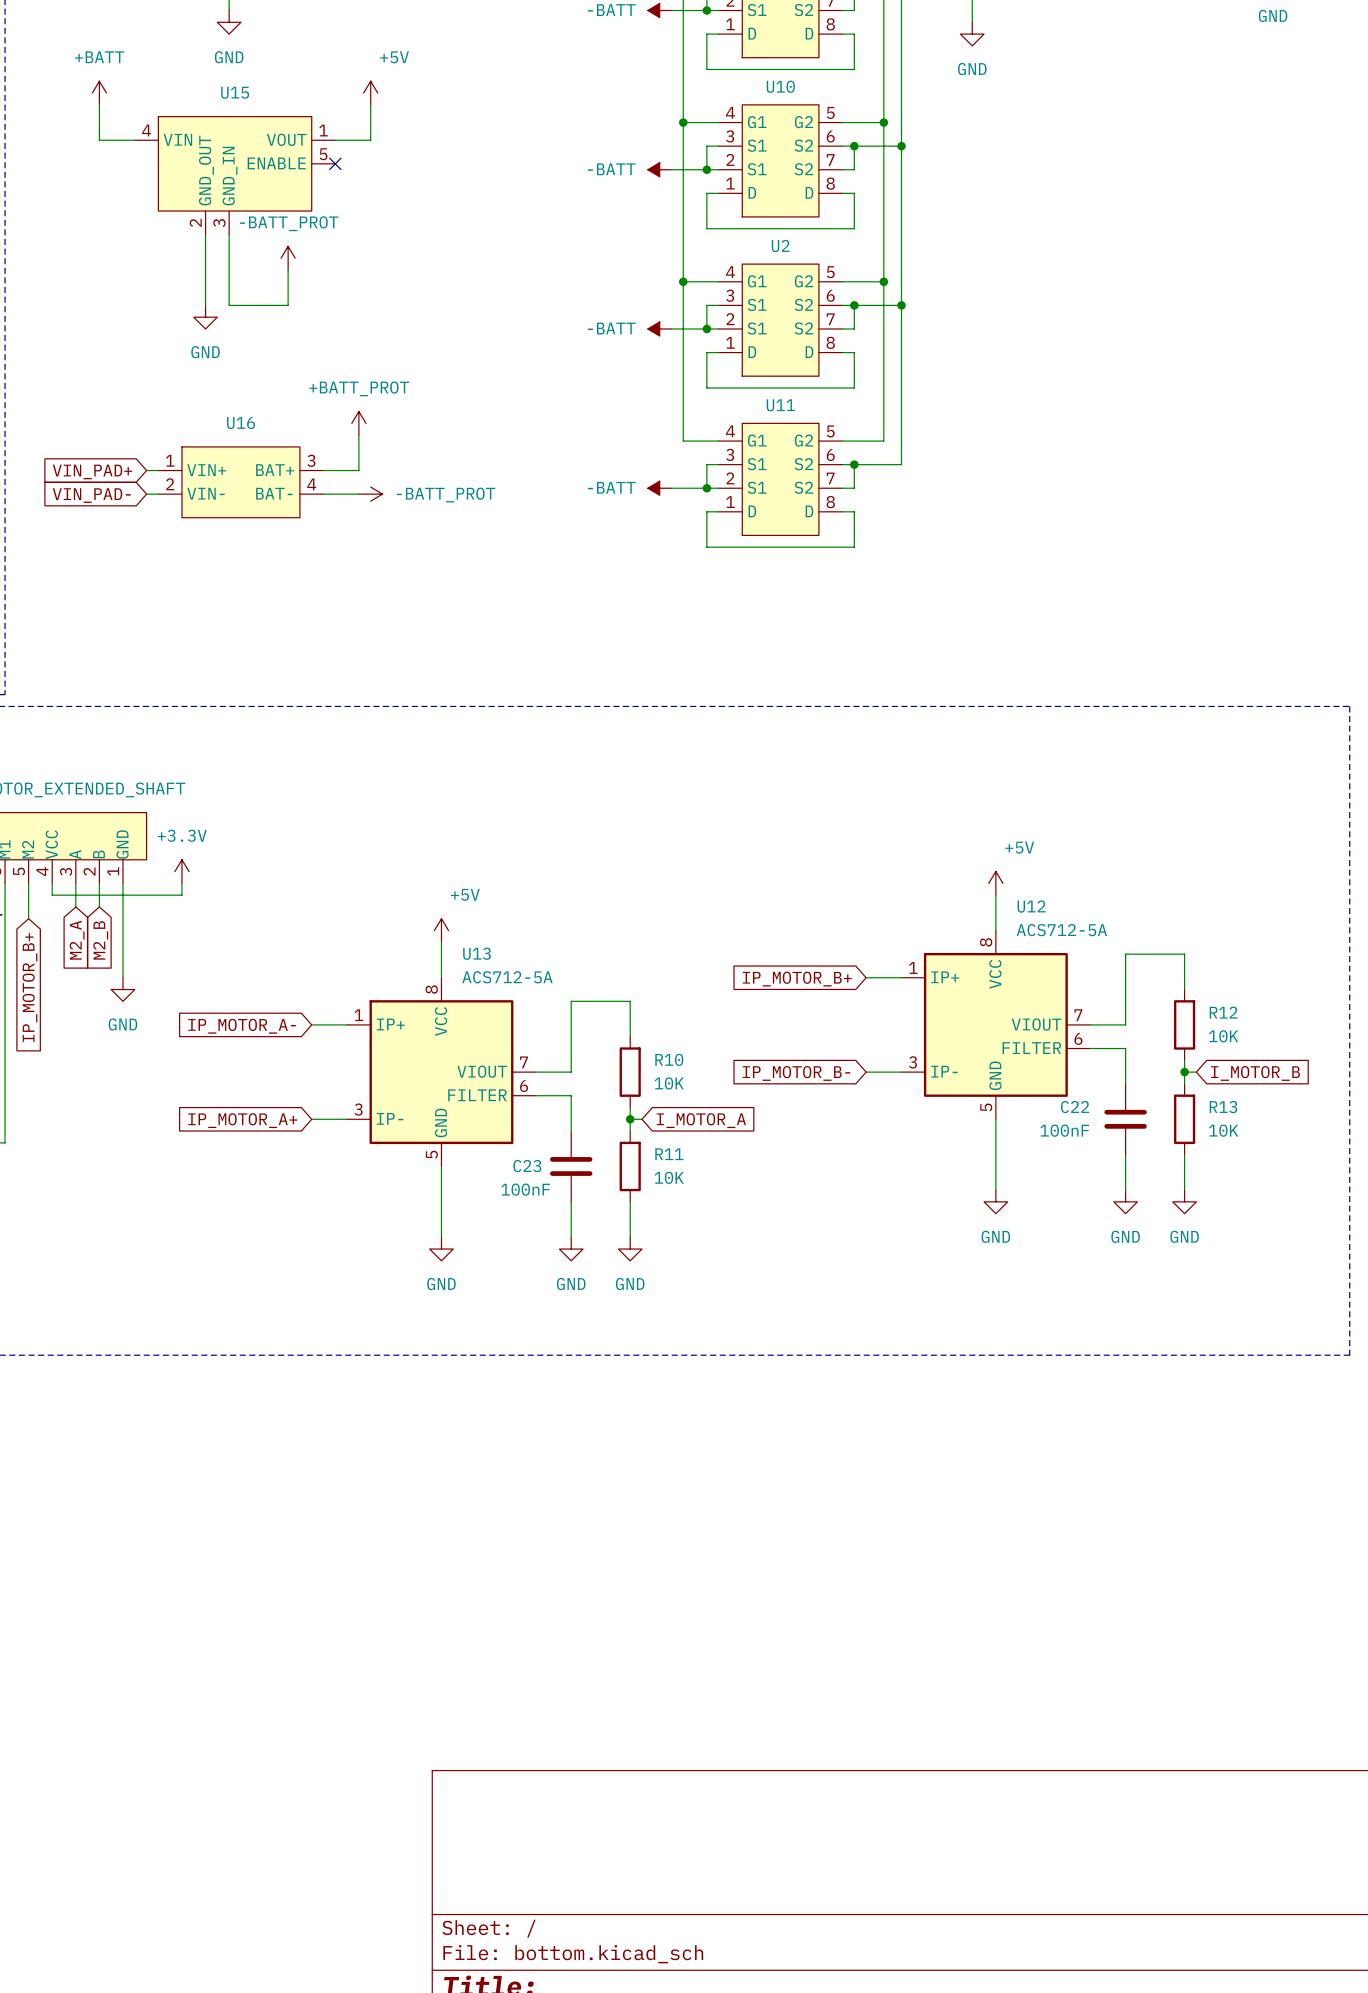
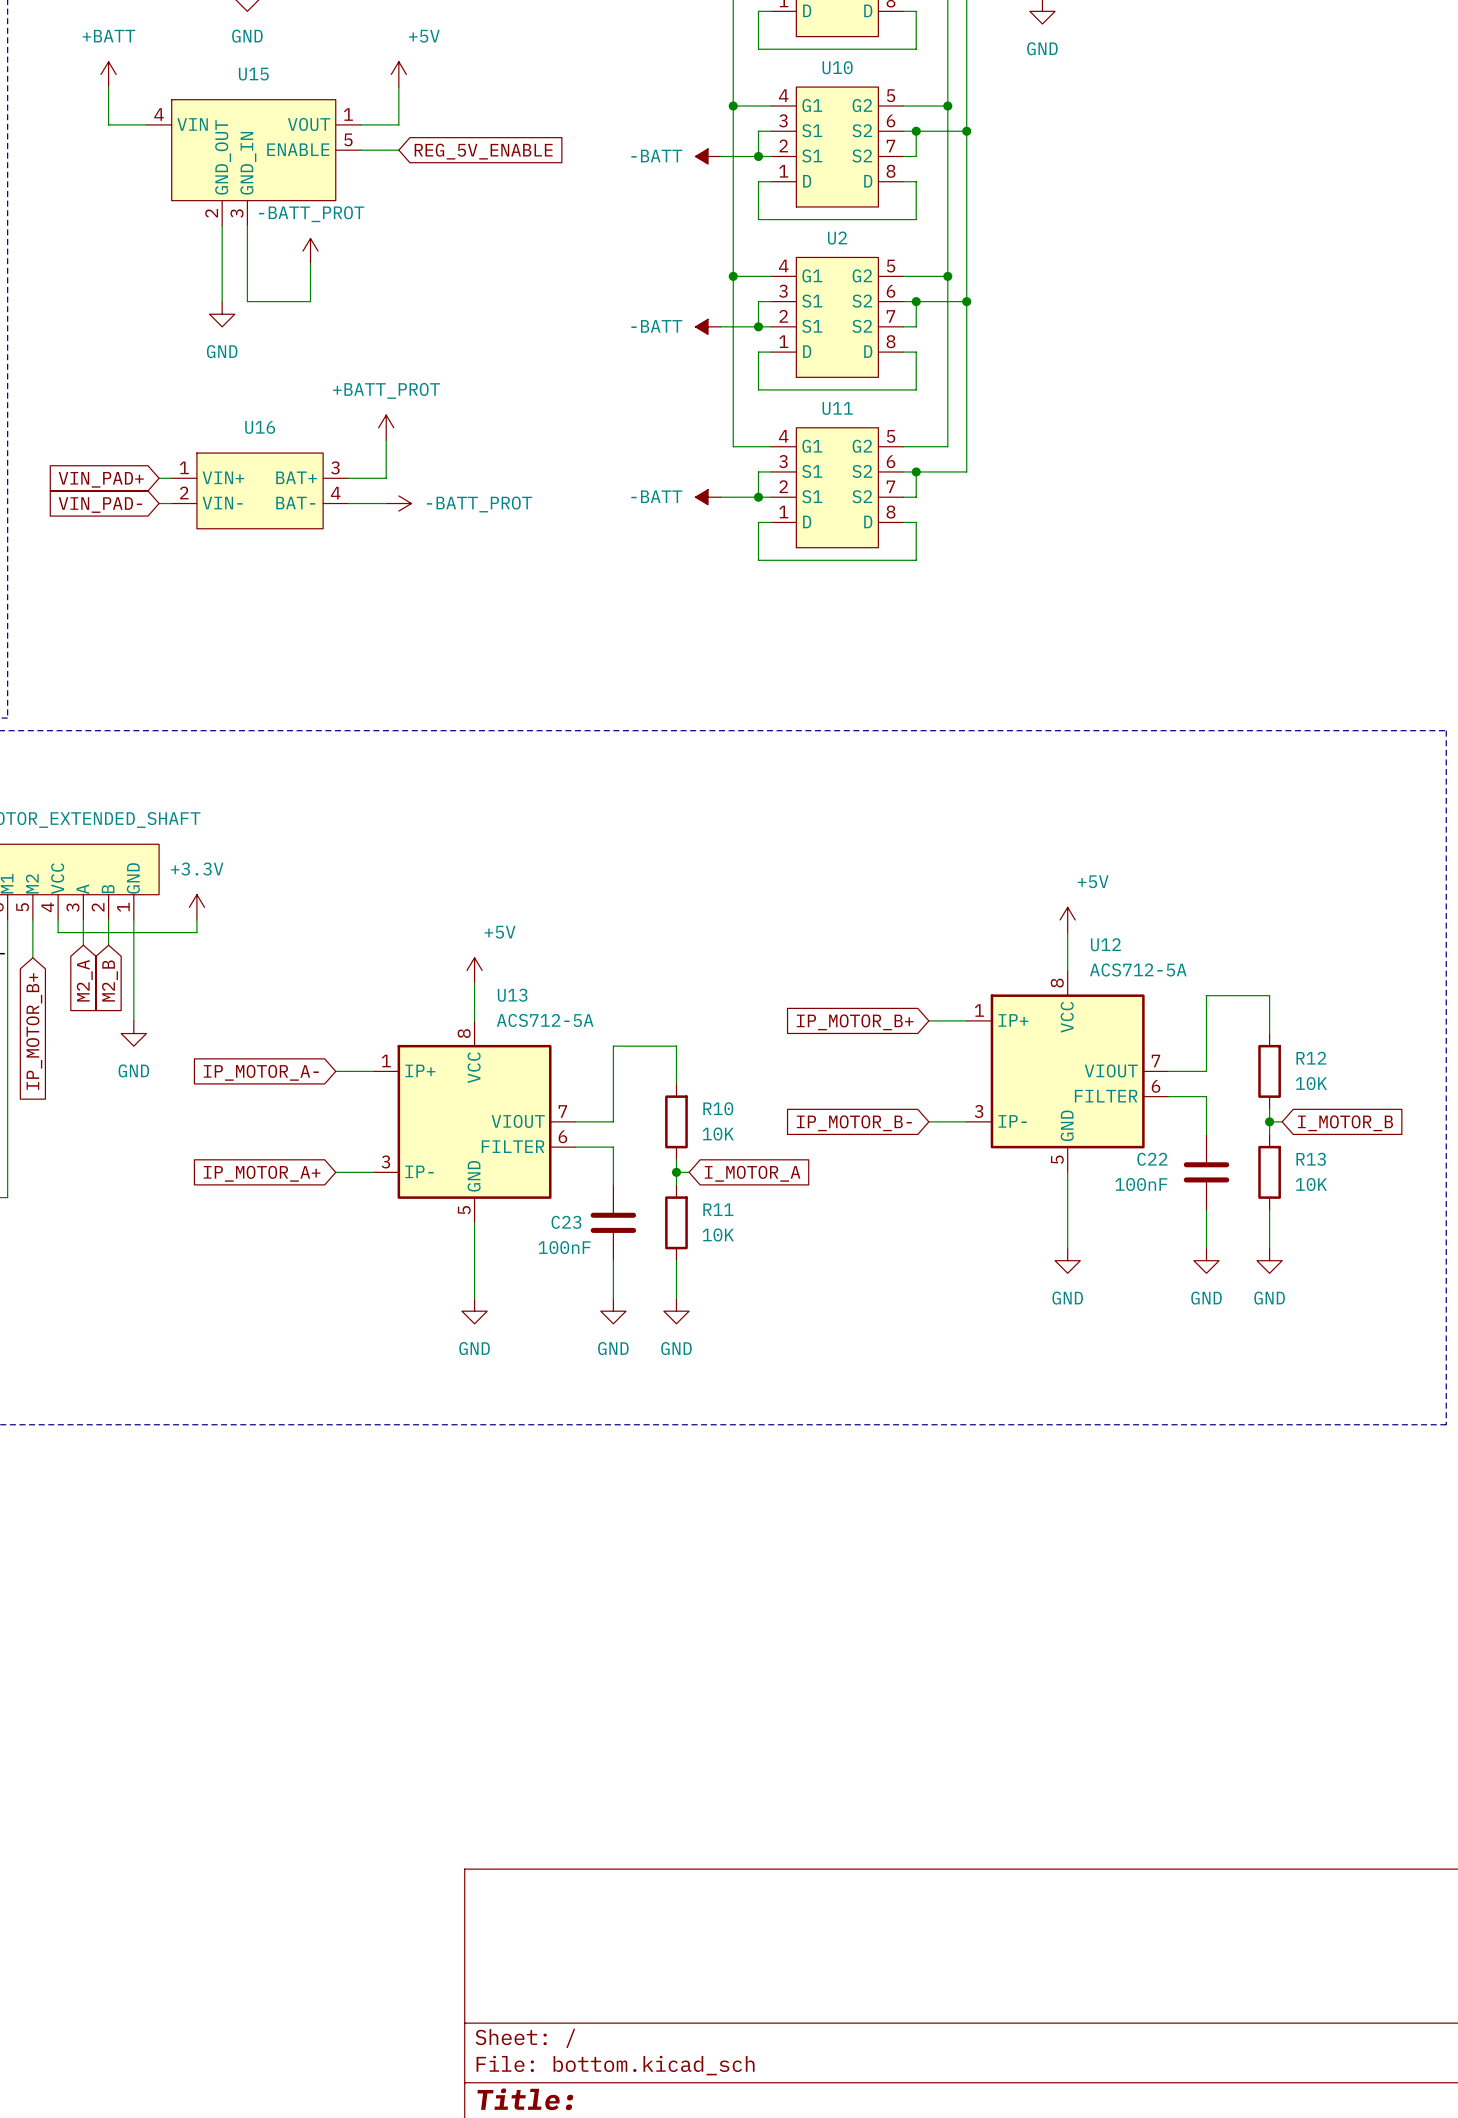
wire: none -> (360, 150) (398, 150)
no-connect mark: (335, 163) -> none
global label: none -> REG_5V_ENABLE (483, 151)

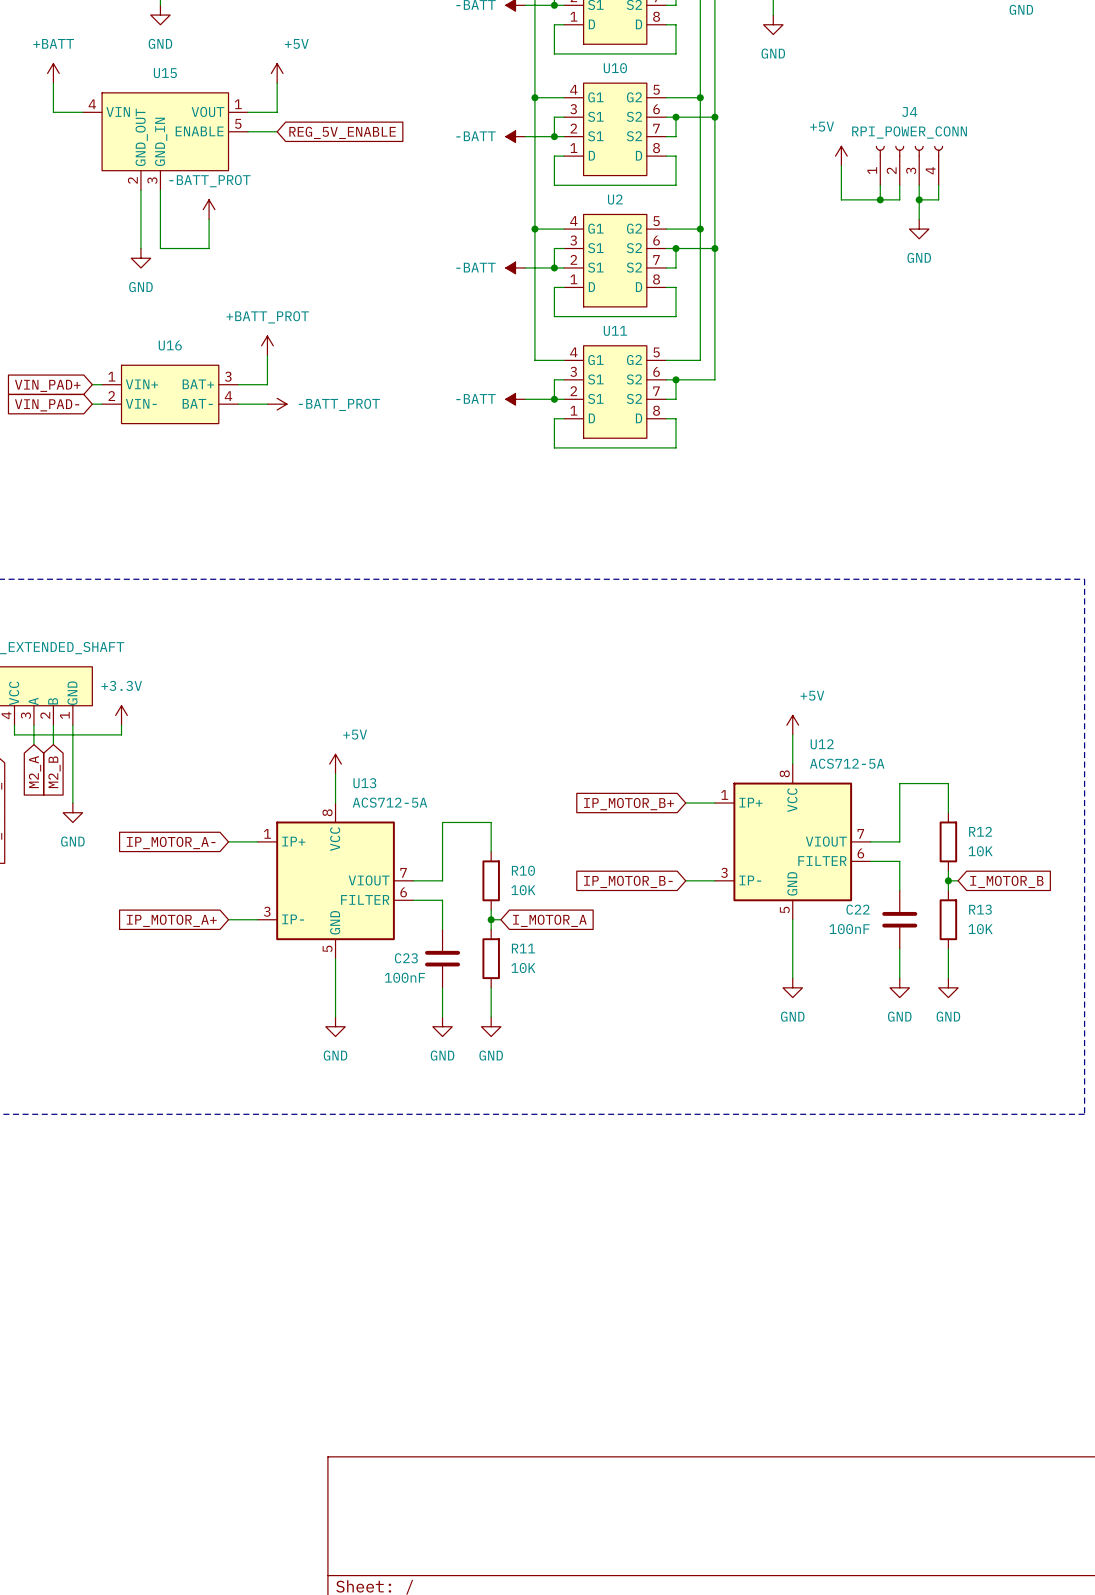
power symbol: none -> +5V (841, 156)
J4: none -> RPI_POWER_CONN (909, 165)
wire: none -> (841, 165) (841, 199) (899, 199) (899, 185)
wire: none -> (880, 185) (880, 199)
wire: none -> (919, 185) (919, 219)
wire: none -> (938, 185) (938, 199) (919, 199)
junction: none -> (880, 199)
junction: none -> (919, 199)
power symbol: none -> GND (919, 229)

